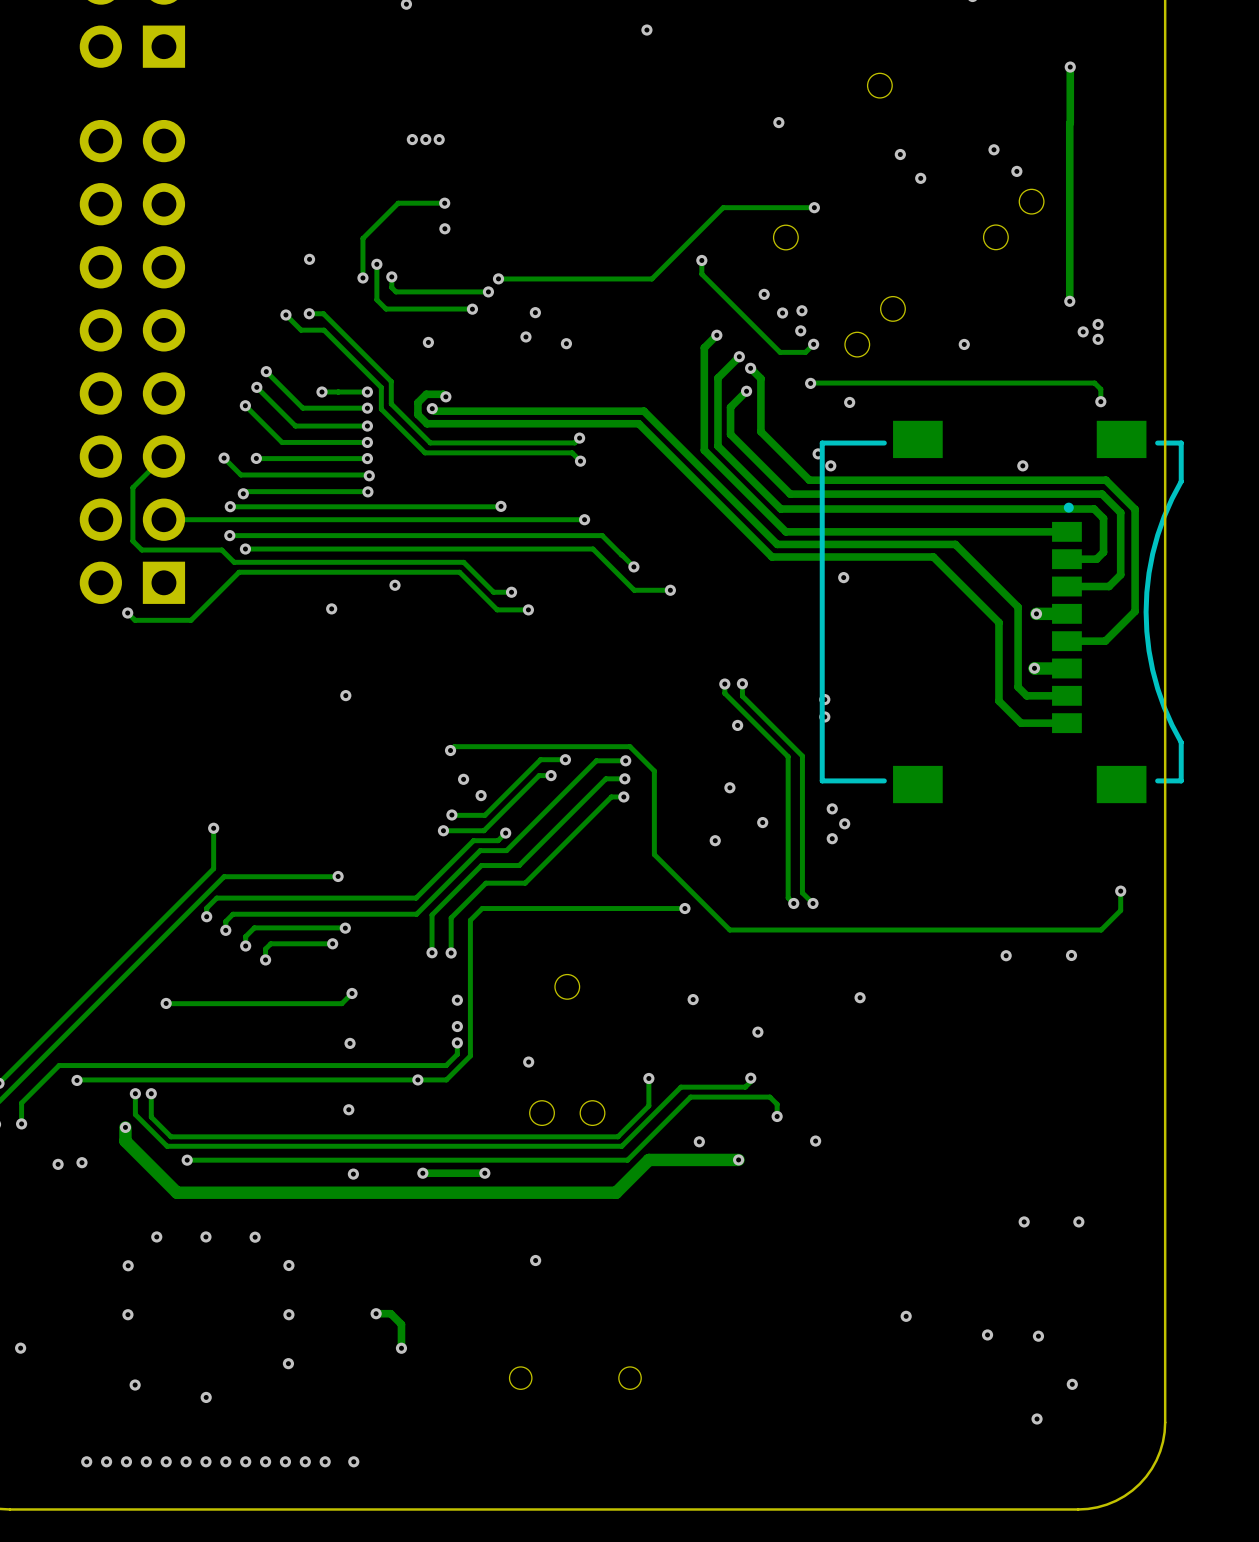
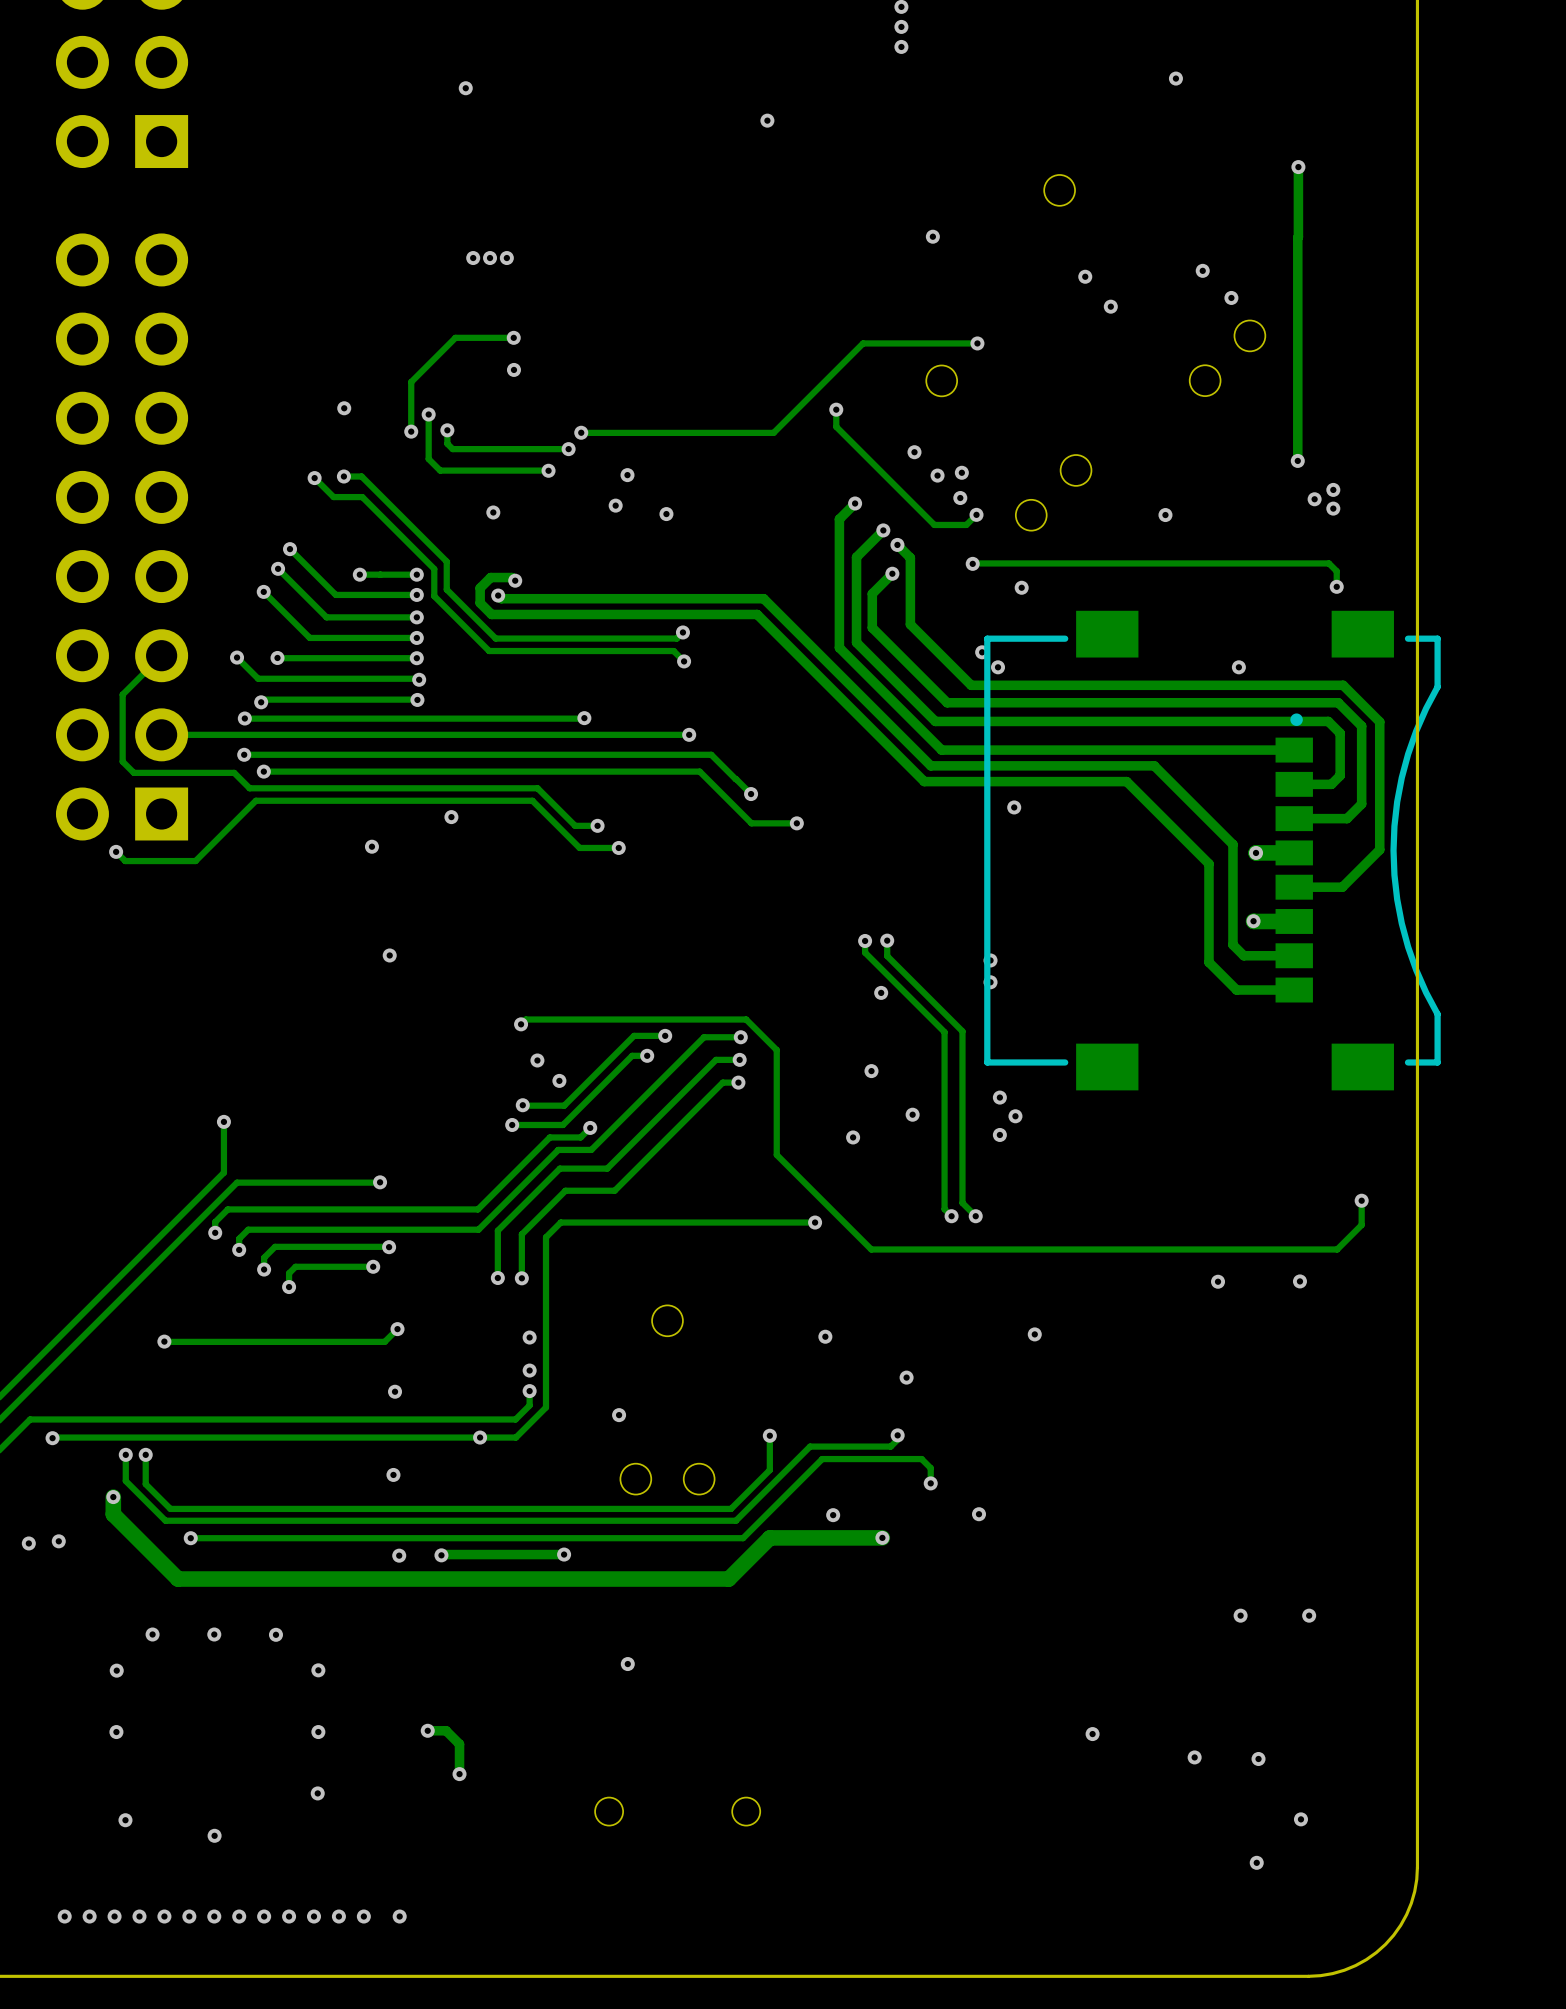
track: none -> (486, 1554) (441, 1555)
via position: (422, 1173) -> (441, 1555)

